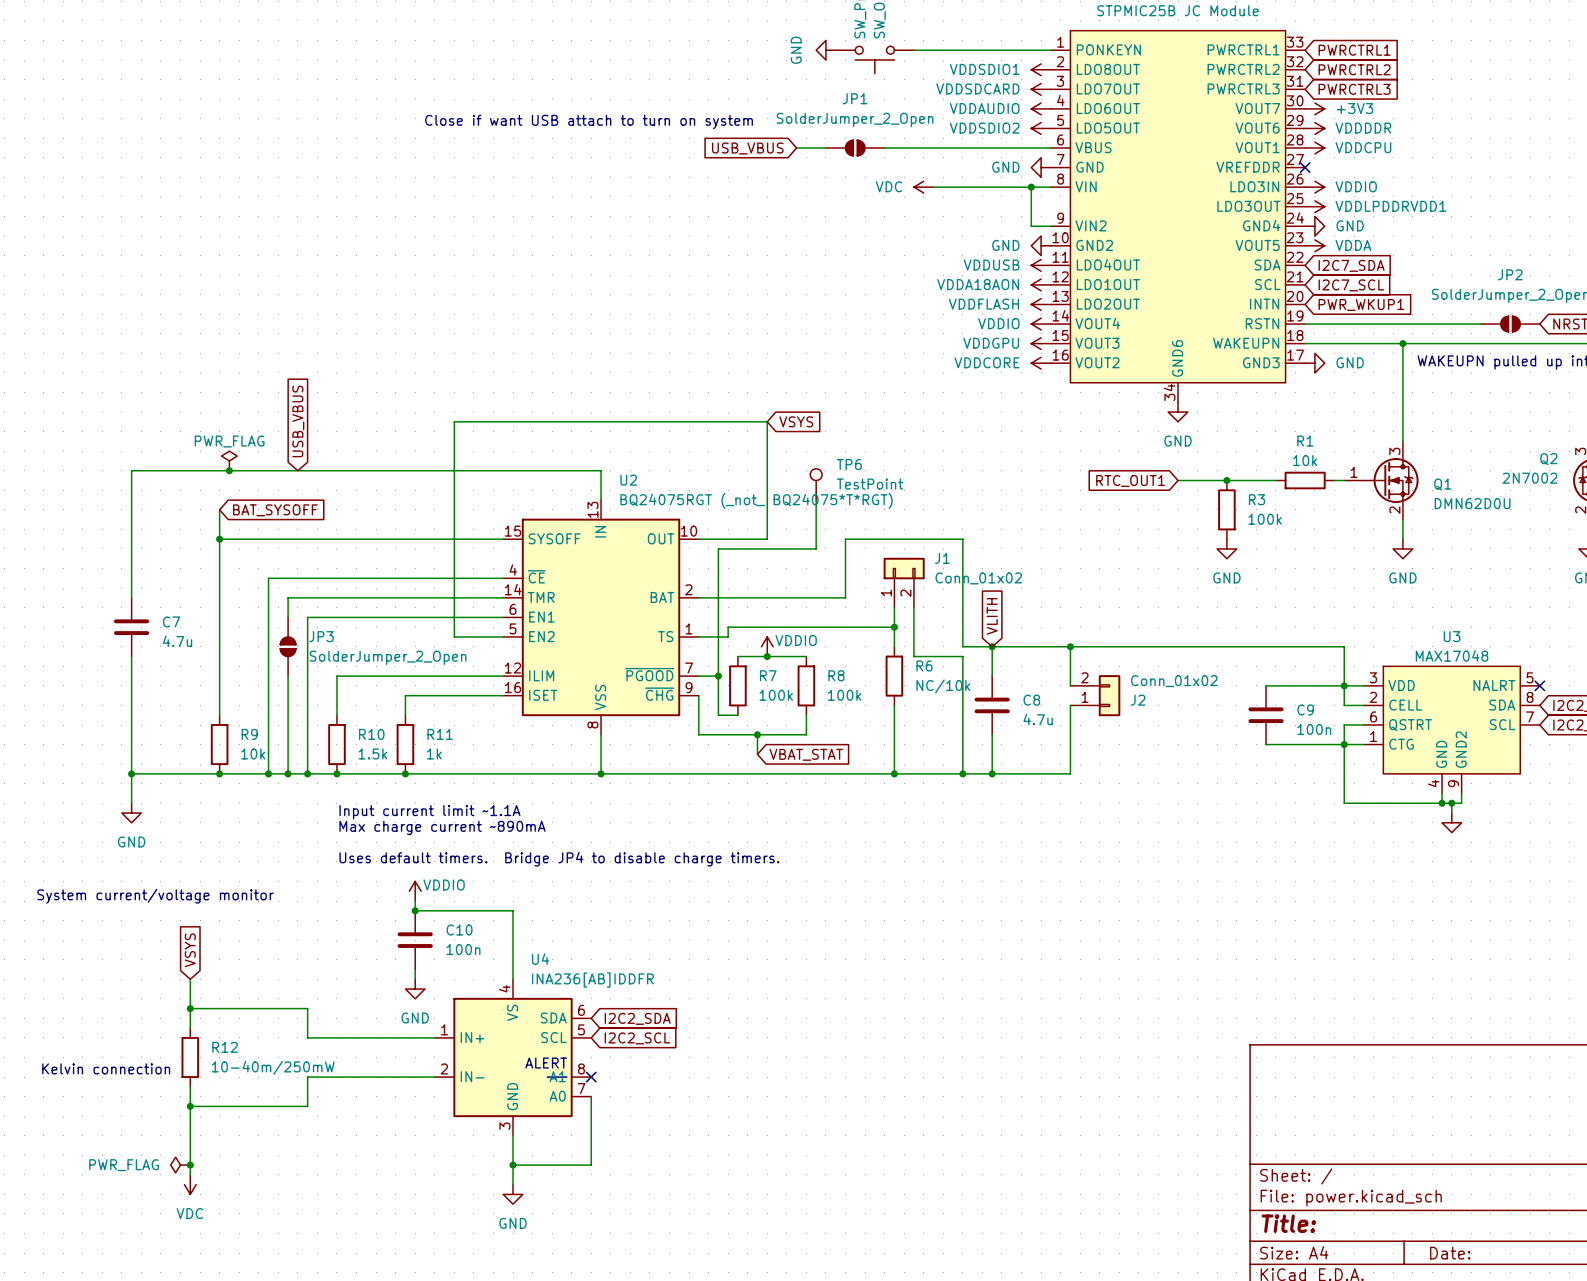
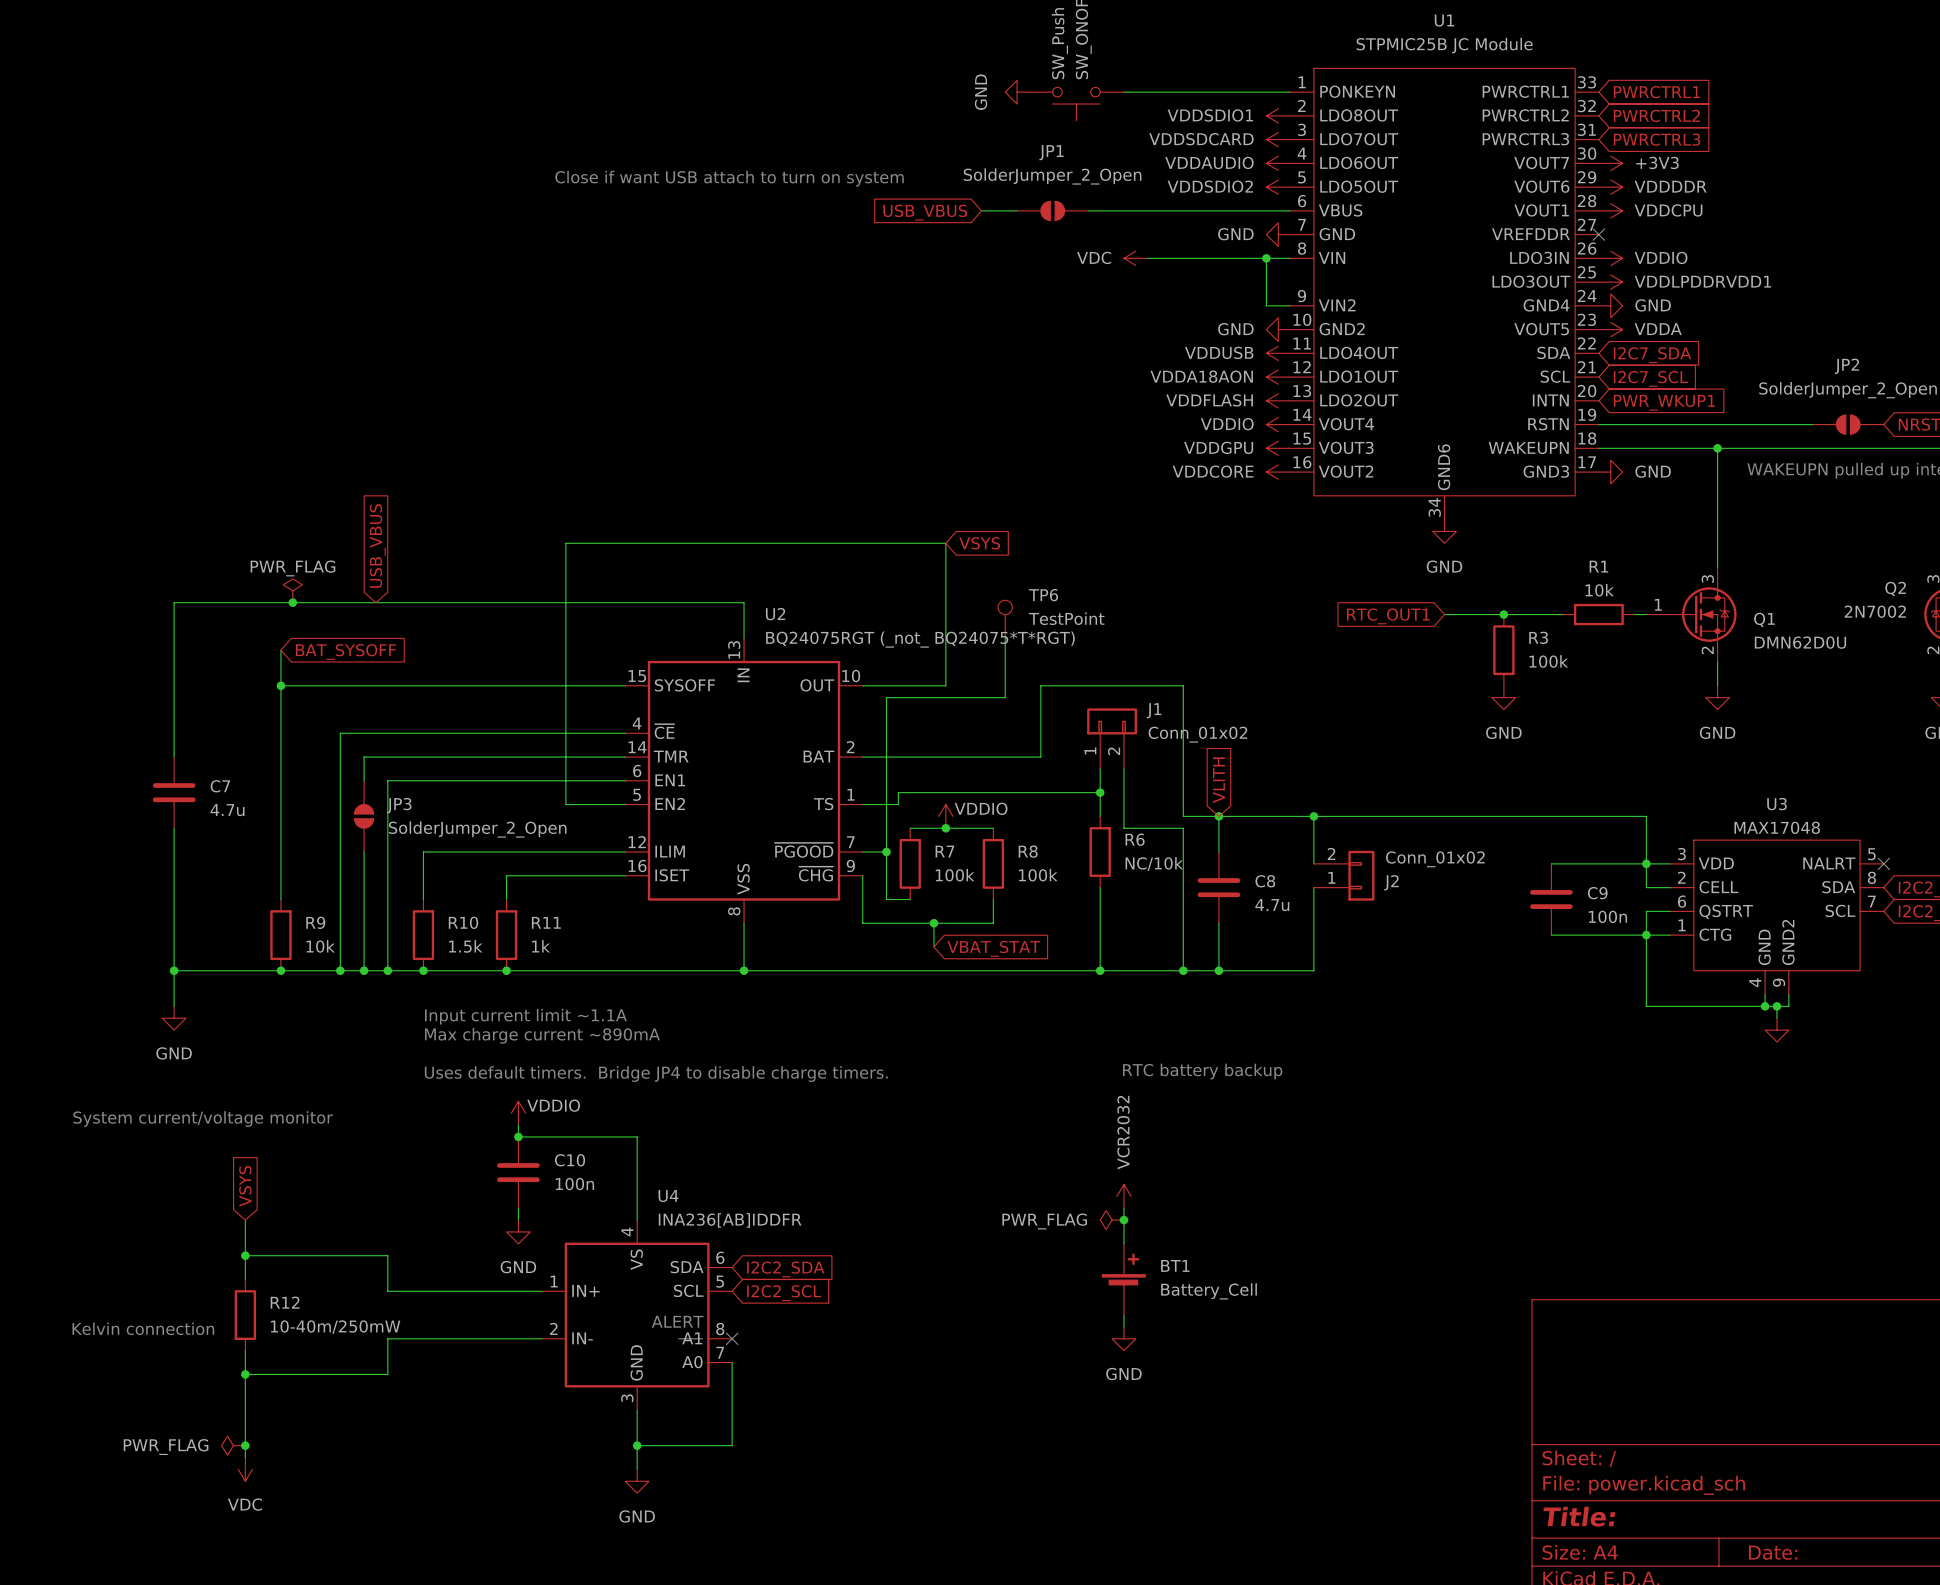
text: none -> RTC battery backup (1202, 1071)
power symbol: none -> VCR2032 (1123, 1196)
wire: none -> (1123, 1208) (1123, 1243)
power symbol: none -> PWR_FLAG (1112, 1220)
junction: none -> (1123, 1220)
BT1: none -> Battery_Cell (1123, 1279)
wire: none -> (1123, 1315) (1123, 1326)
power symbol: none -> GND (1123, 1338)

